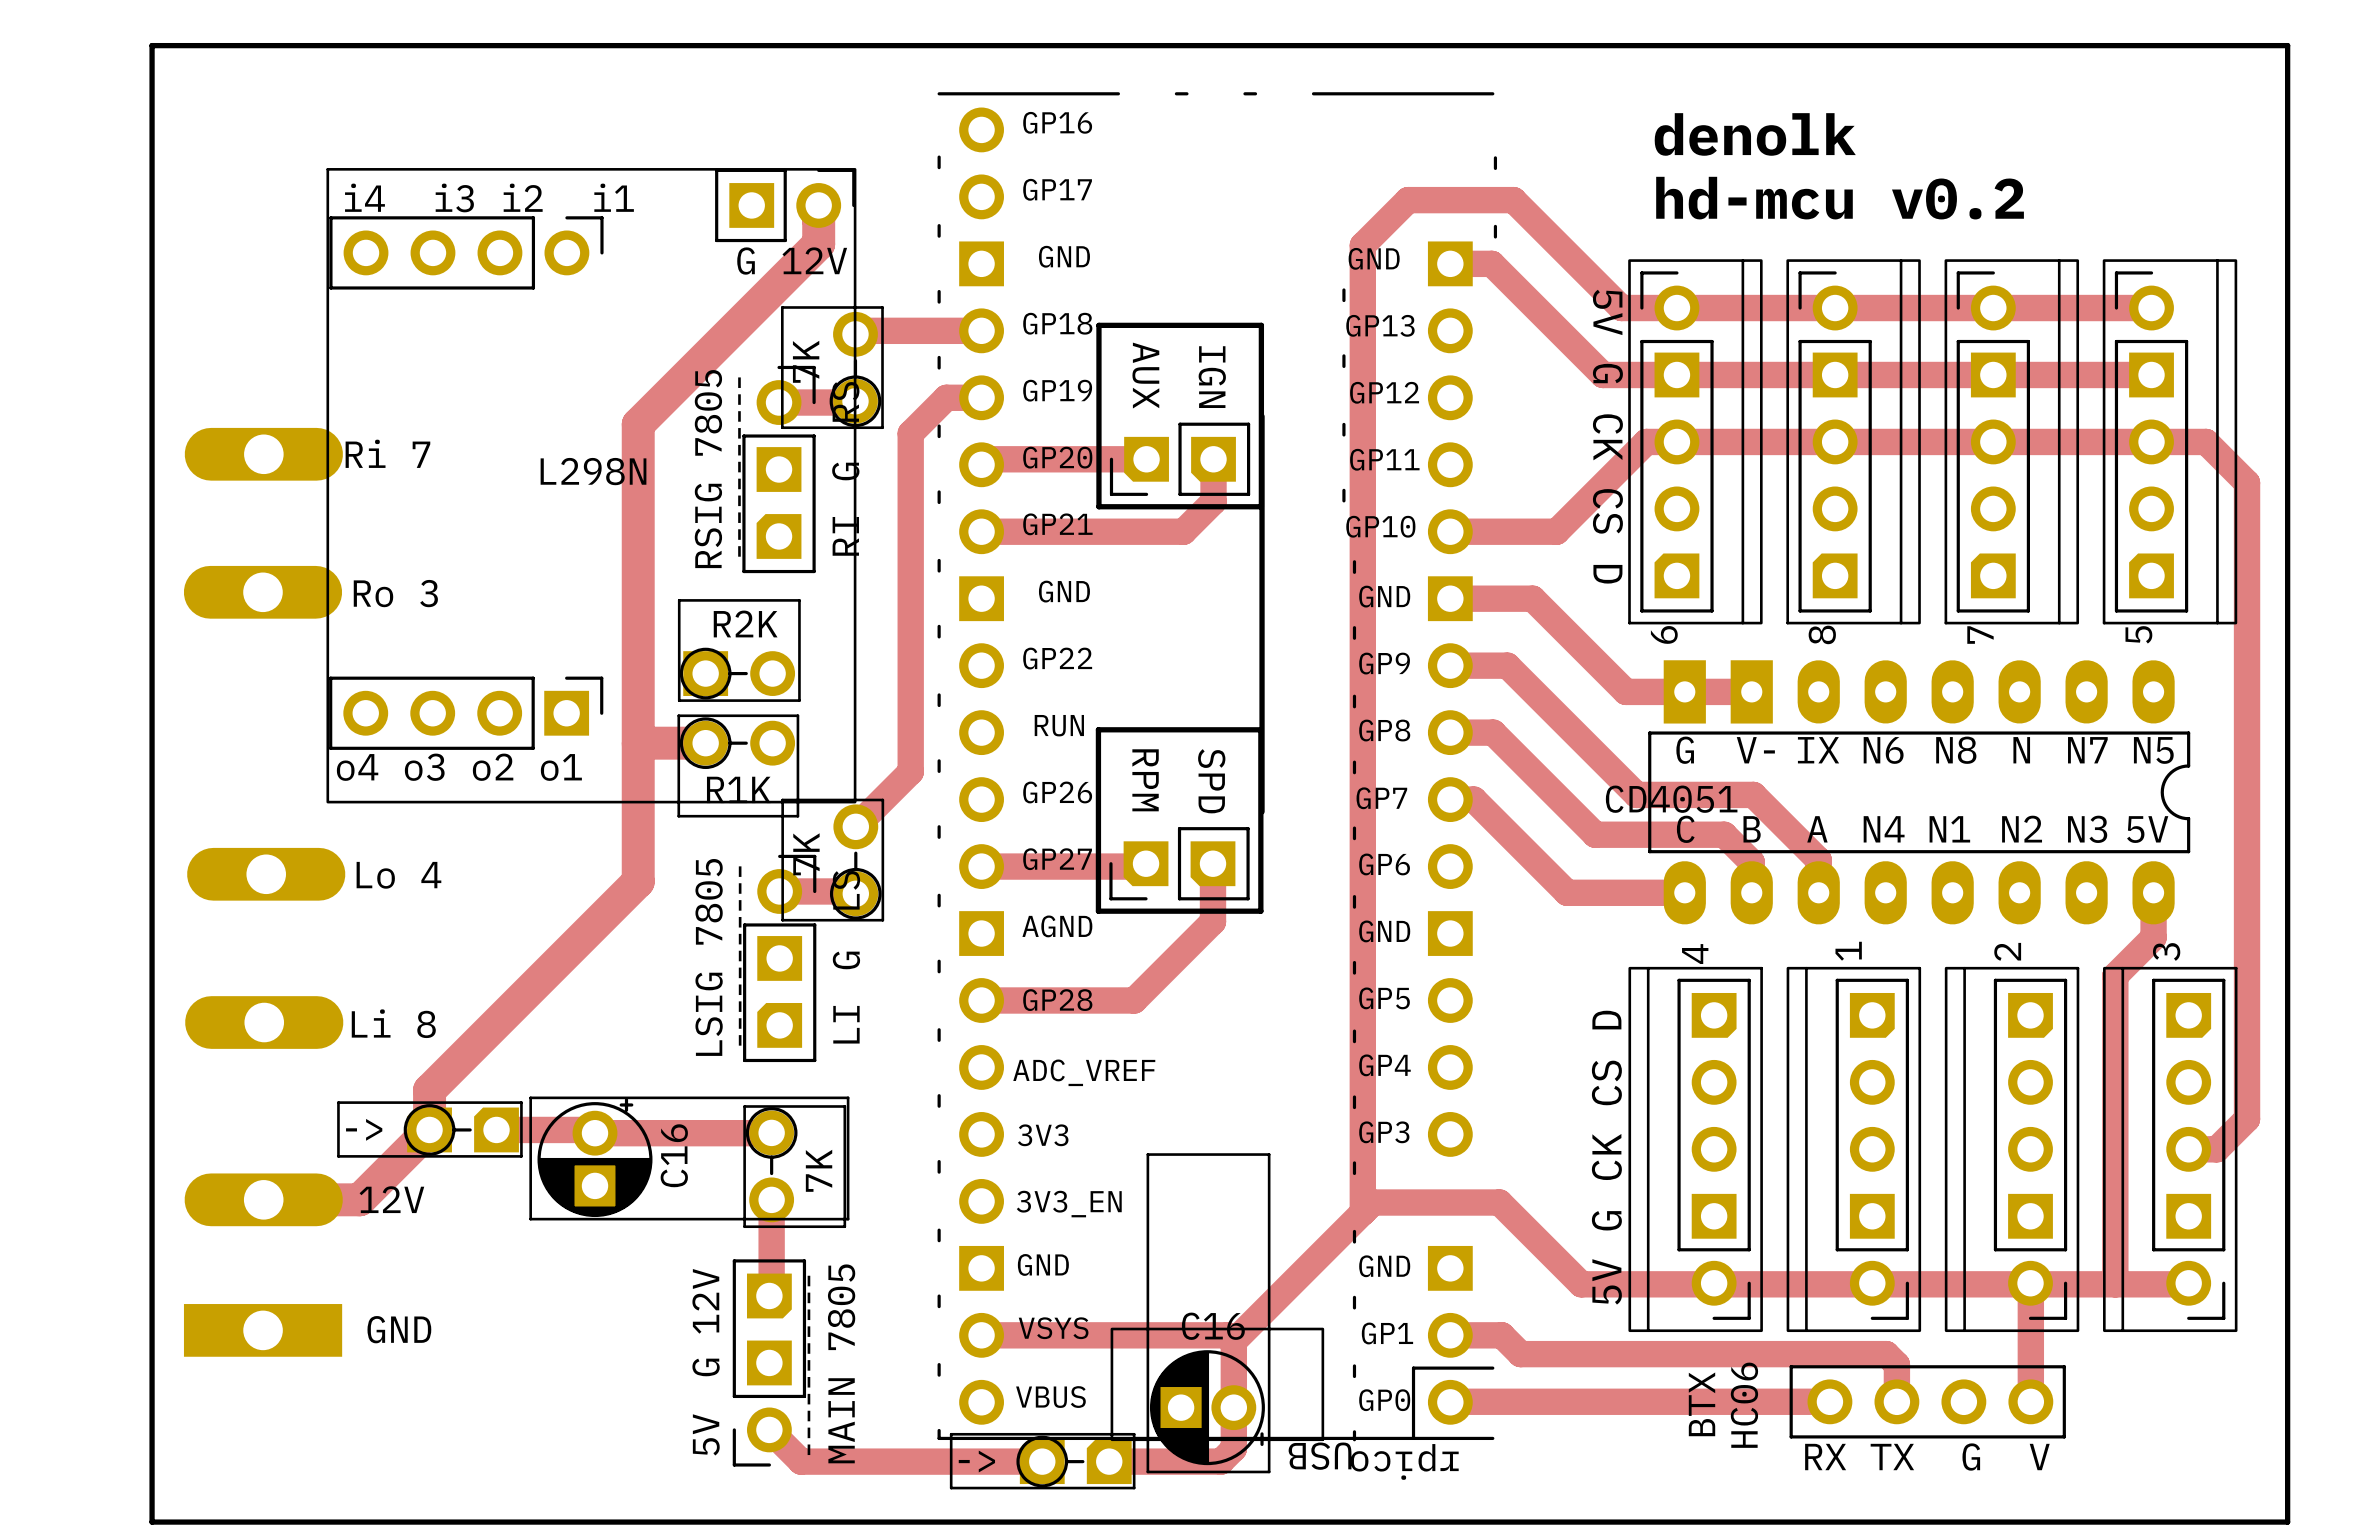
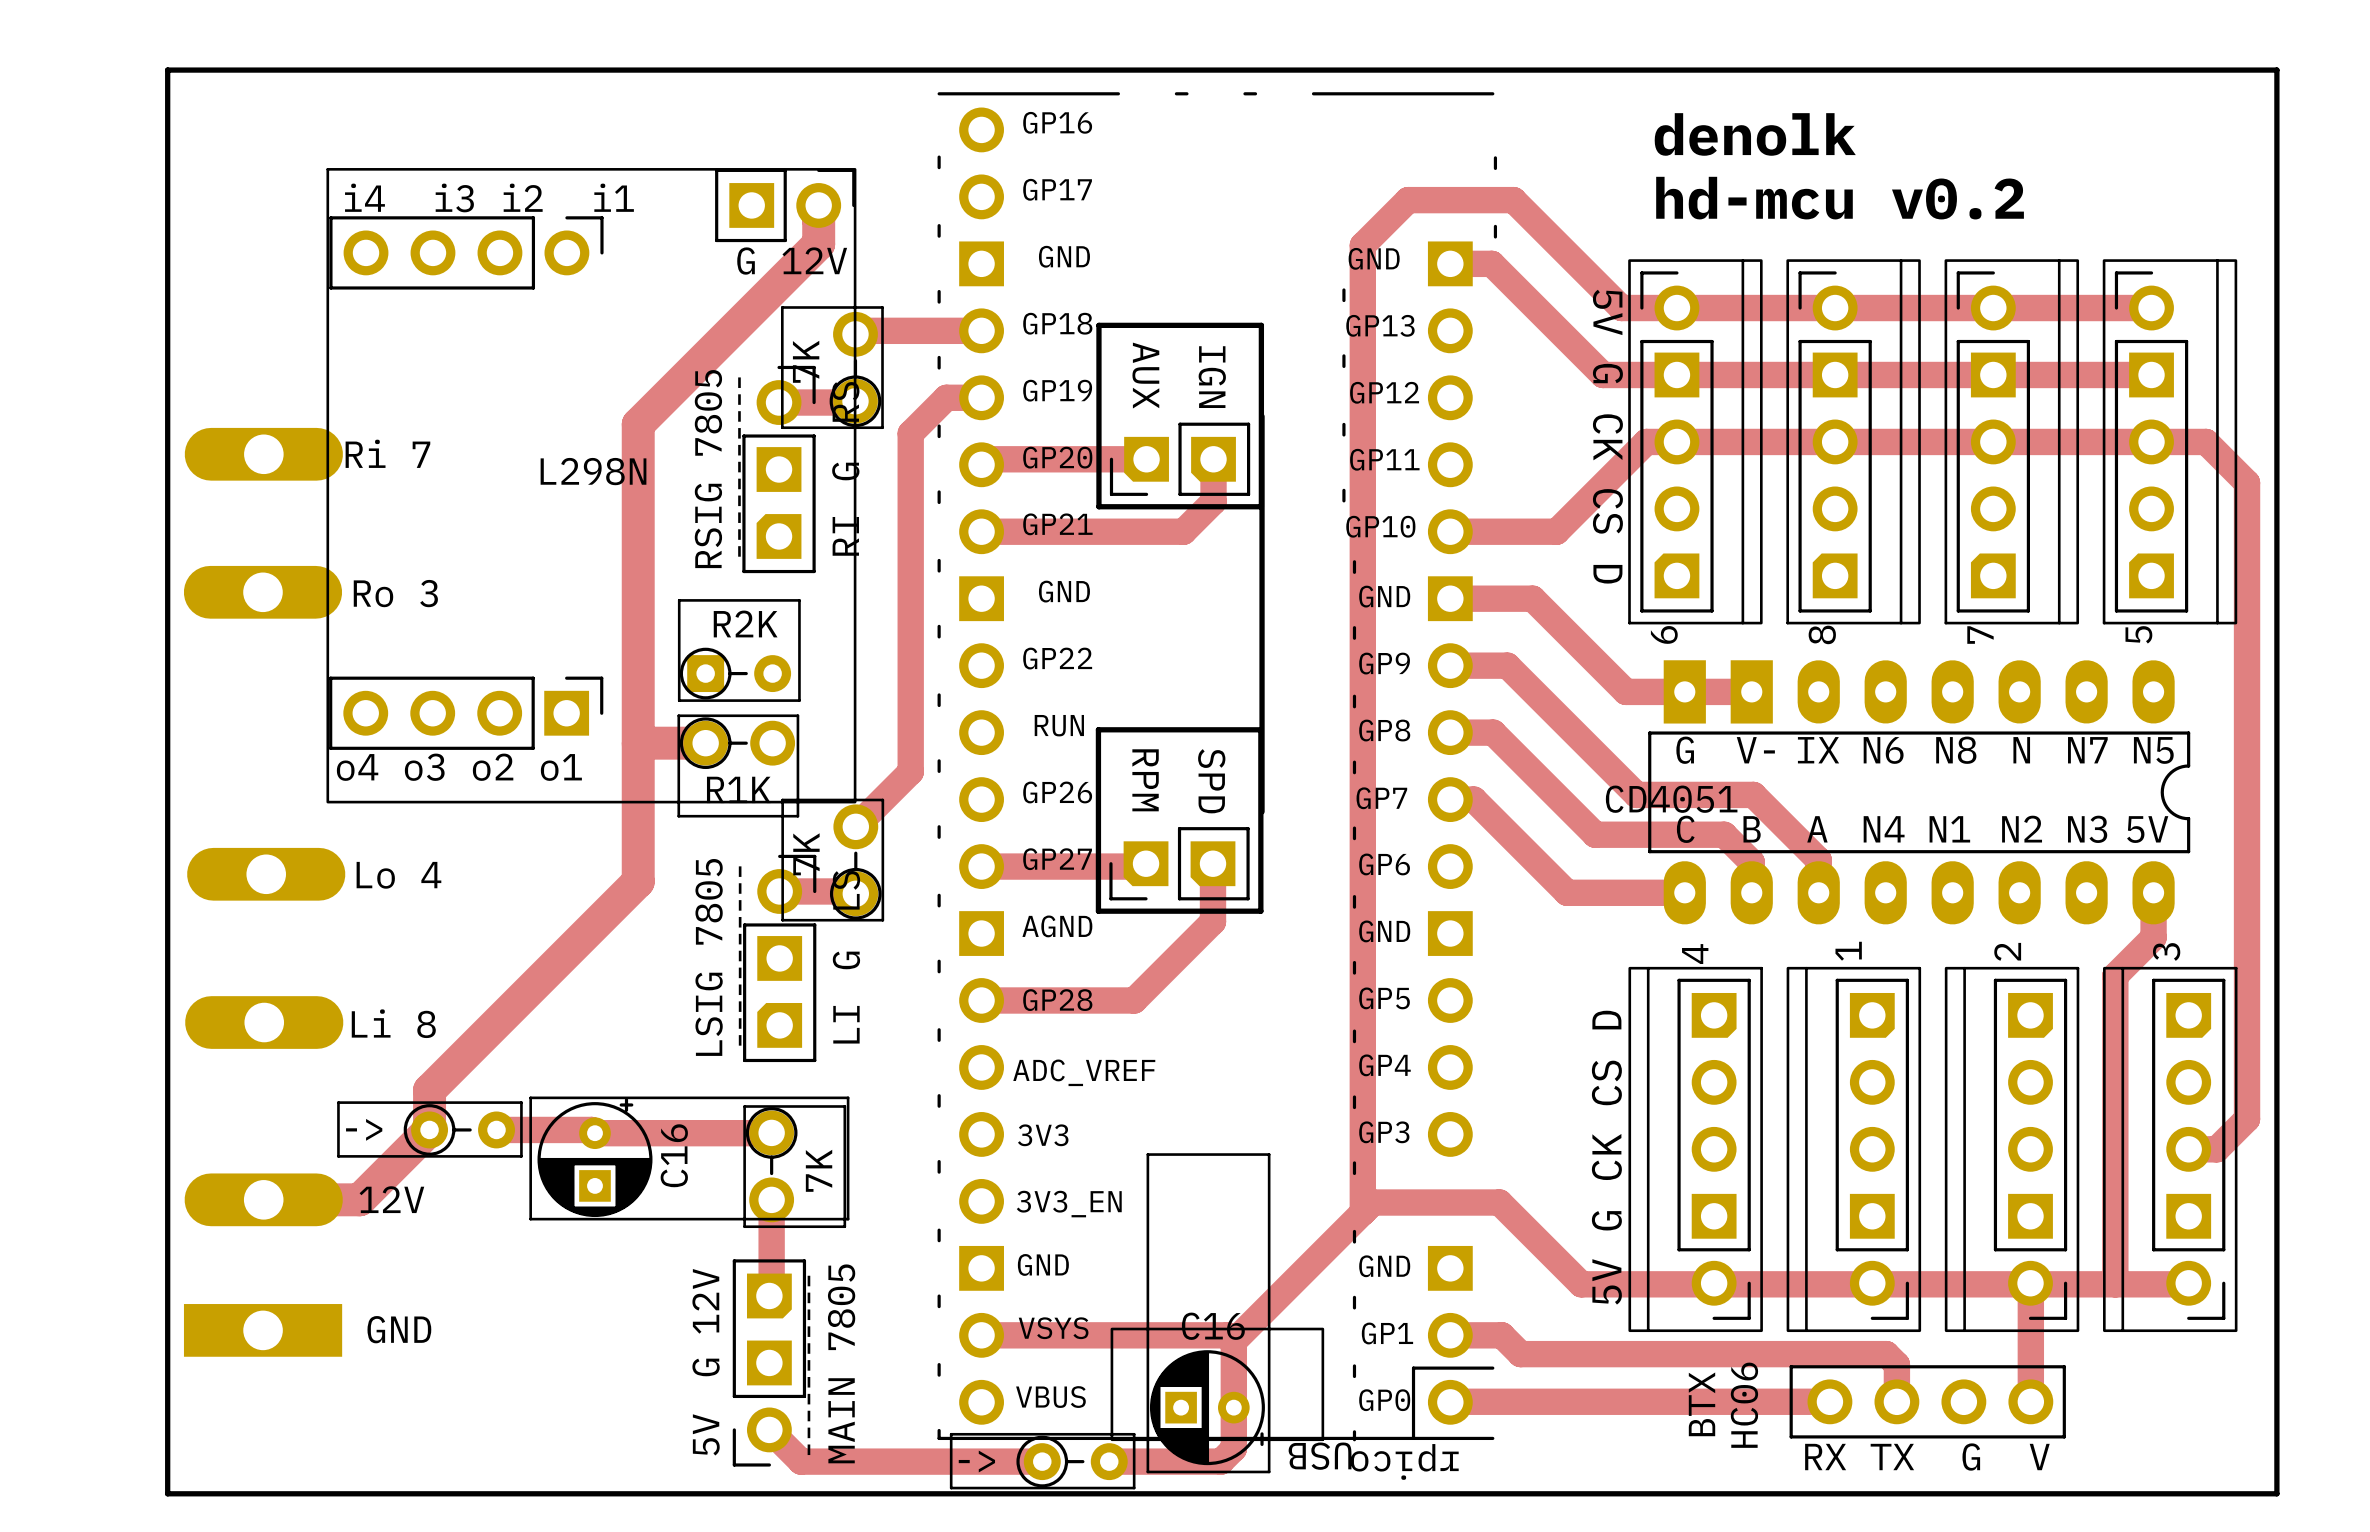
board edge: (152, 45) (2287, 45) (2287, 1522) (152, 1522) (152, 45) -> (167, 70) (167, 1493) (2276, 1493) (2276, 70) (167, 70)
R2K footprint: [679, 647, 796, 700] -> [679, 647, 792, 700]
part footprint: [537, 1098, 653, 1218] -> [537, 1098, 653, 1218]
part footprint: [403, 1104, 519, 1156] -> [403, 1104, 515, 1156]
part footprint: [1149, 1350, 1269, 1466] -> [1149, 1350, 1269, 1466]
part footprint: [1016, 1435, 1132, 1488] -> [1016, 1435, 1128, 1488]

